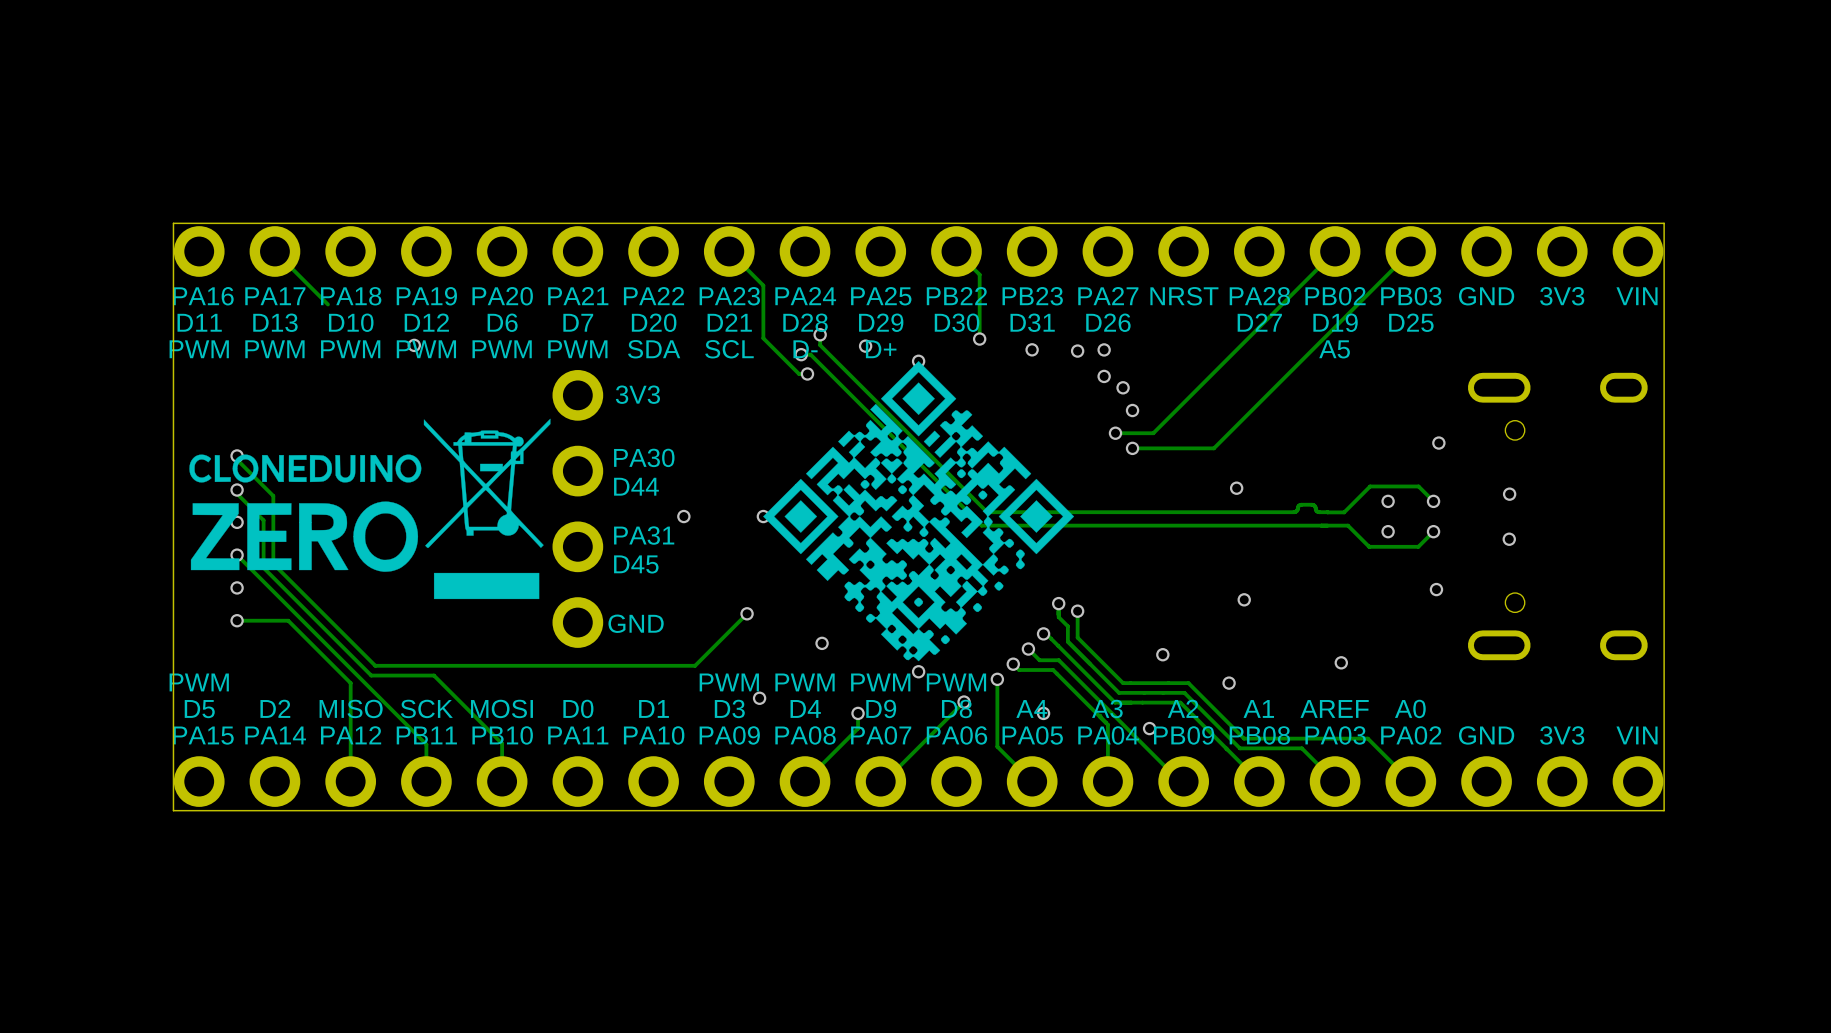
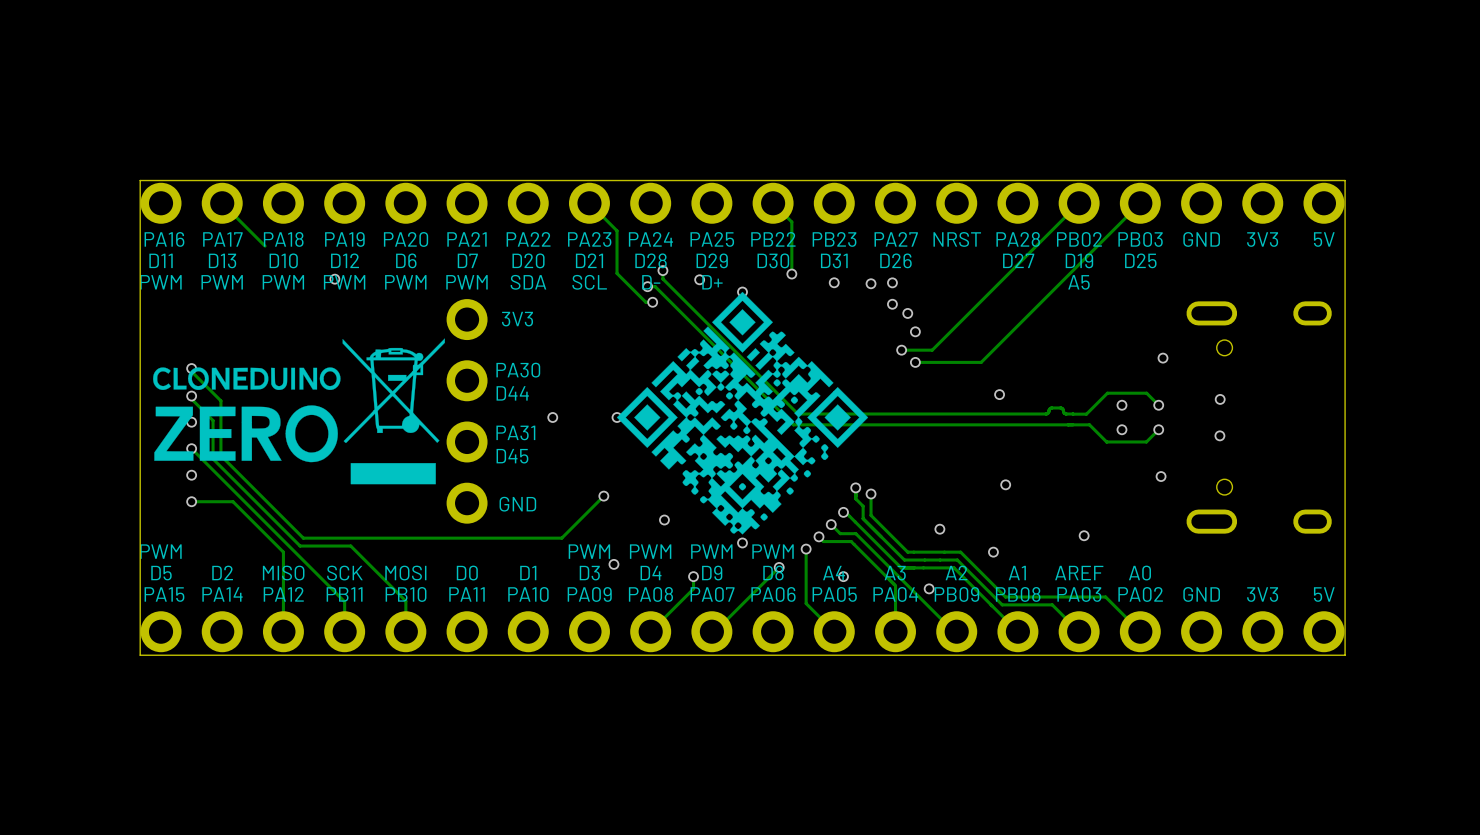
text: VIN (1637, 296) -> 5V (1324, 239)
text: VIN (1637, 735) -> 5V (1324, 594)

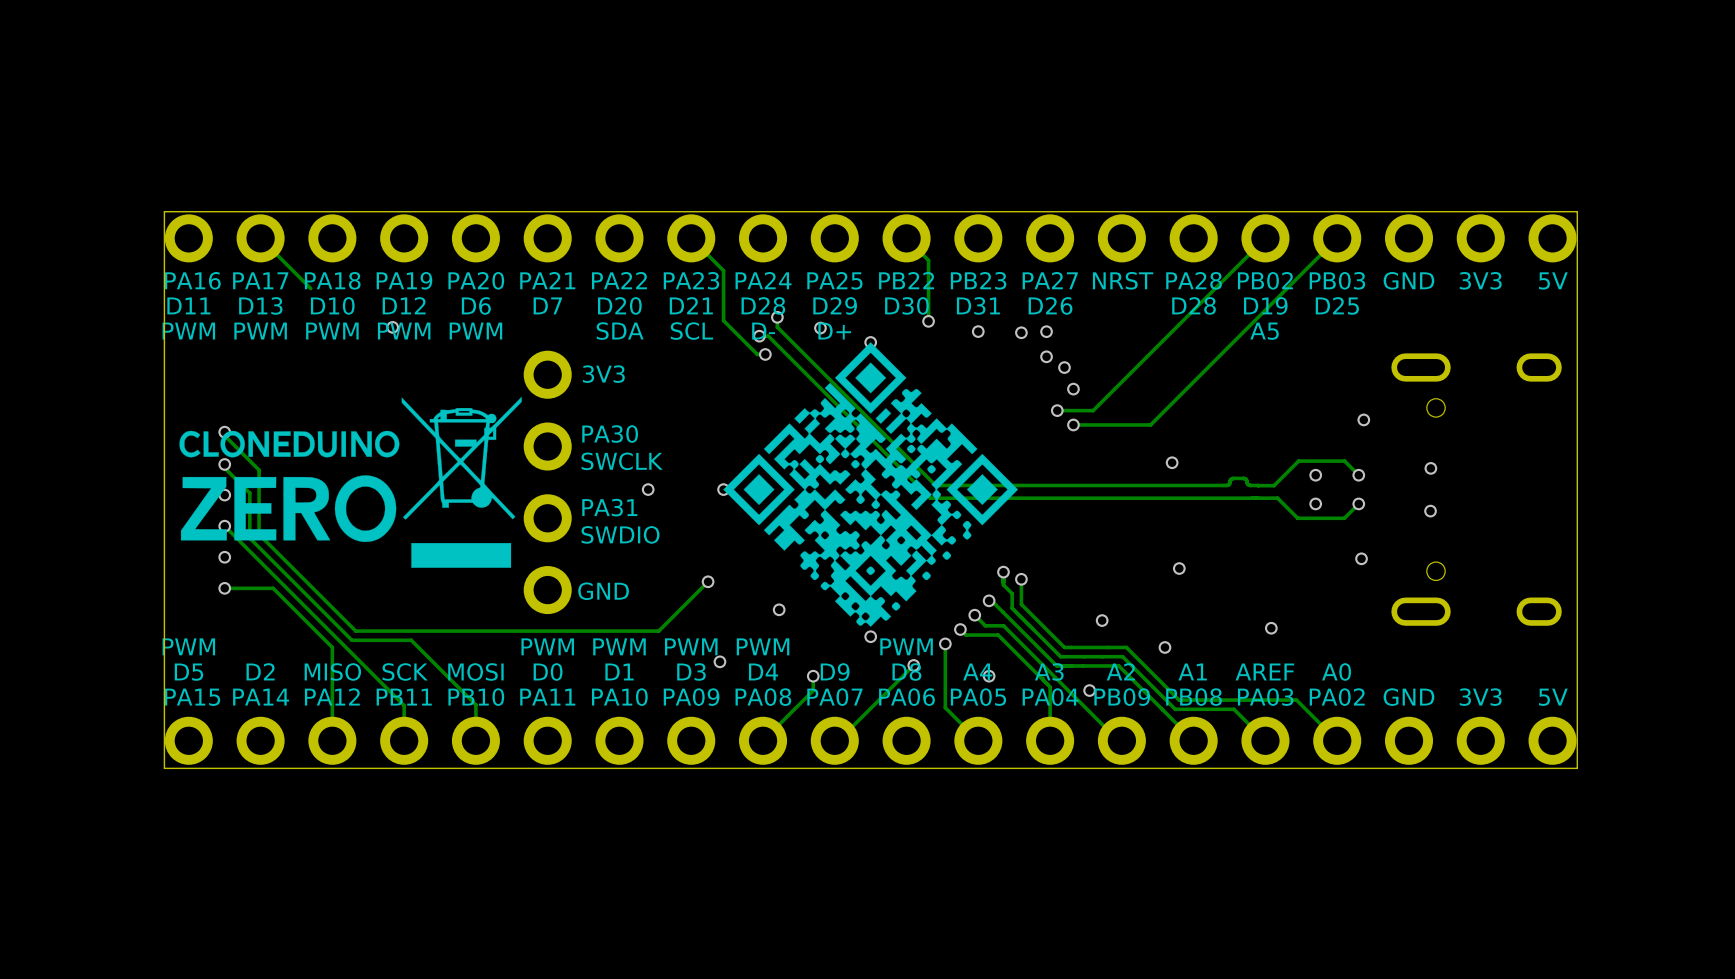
text: D27 (1018, 260) -> D28 (1194, 305)
text: PWM (467, 282) -> none
text: D44 (512, 393) -> SWCLK (622, 461)
text: D45 (512, 456) -> SWDIO (620, 534)
text: none -> PWM (547, 646)
text: none -> PWM (619, 646)
text: PWM (711, 551) -> none

